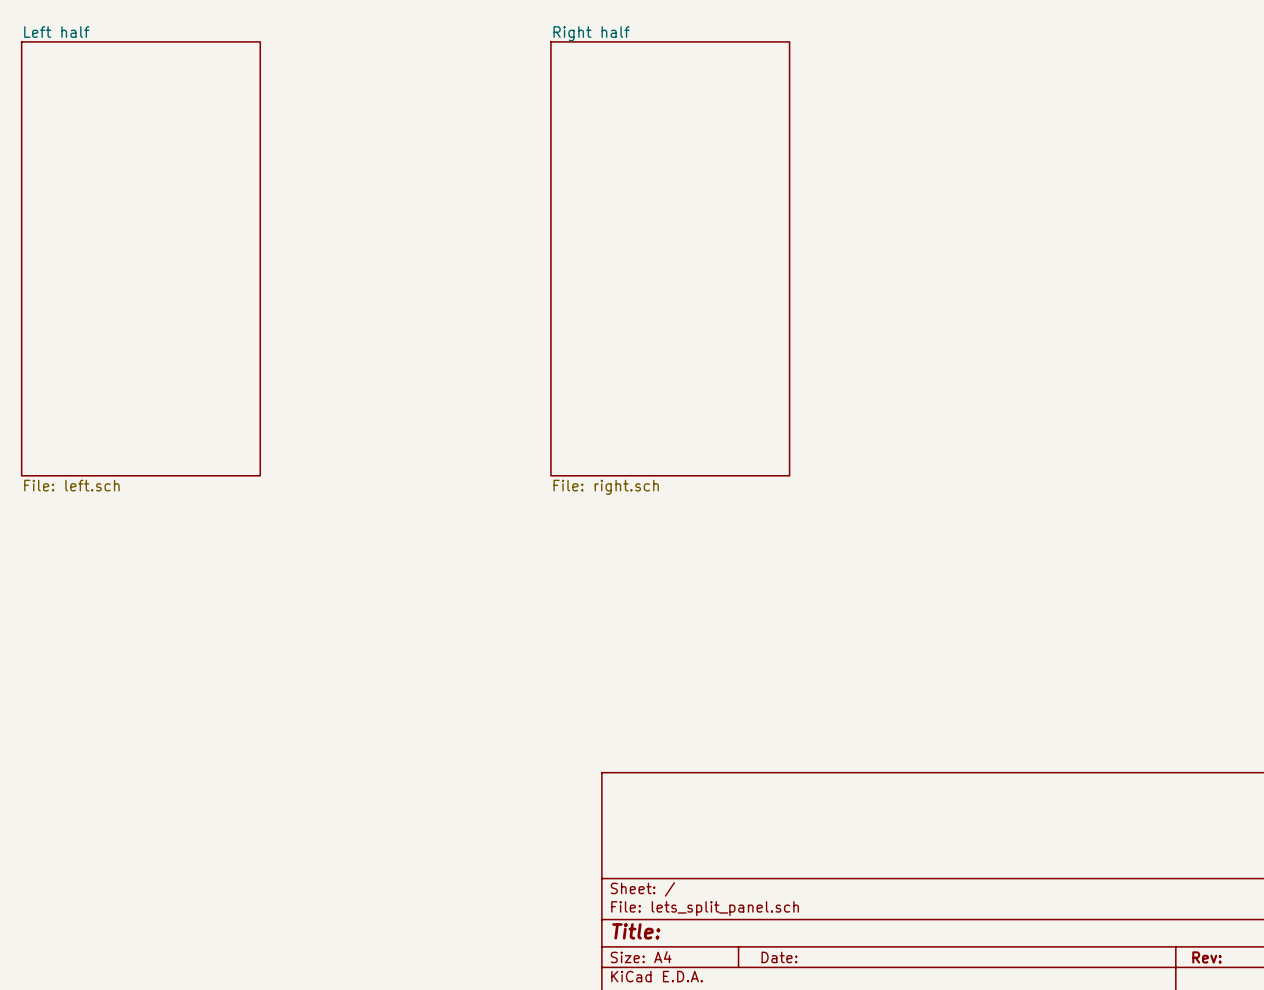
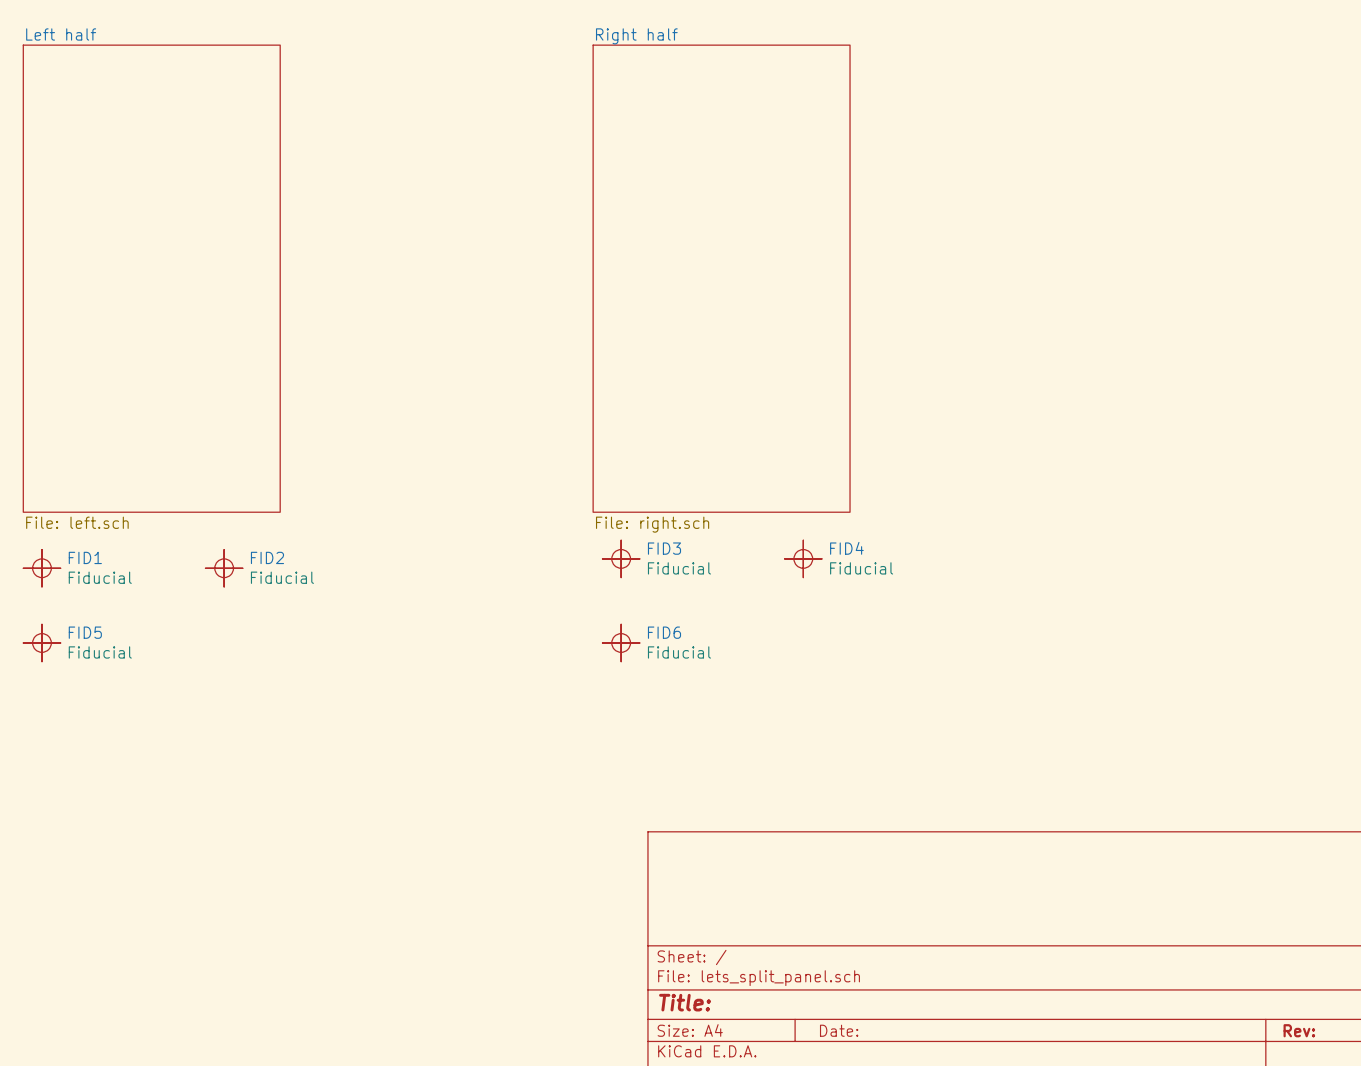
FID3: none -> Fiducial (621, 558)
FID4: none -> Fiducial (803, 558)
FID1: none -> Fiducial (41, 568)
FID2: none -> Fiducial (224, 568)
FID5: none -> Fiducial (41, 642)
FID6: none -> Fiducial (621, 642)

